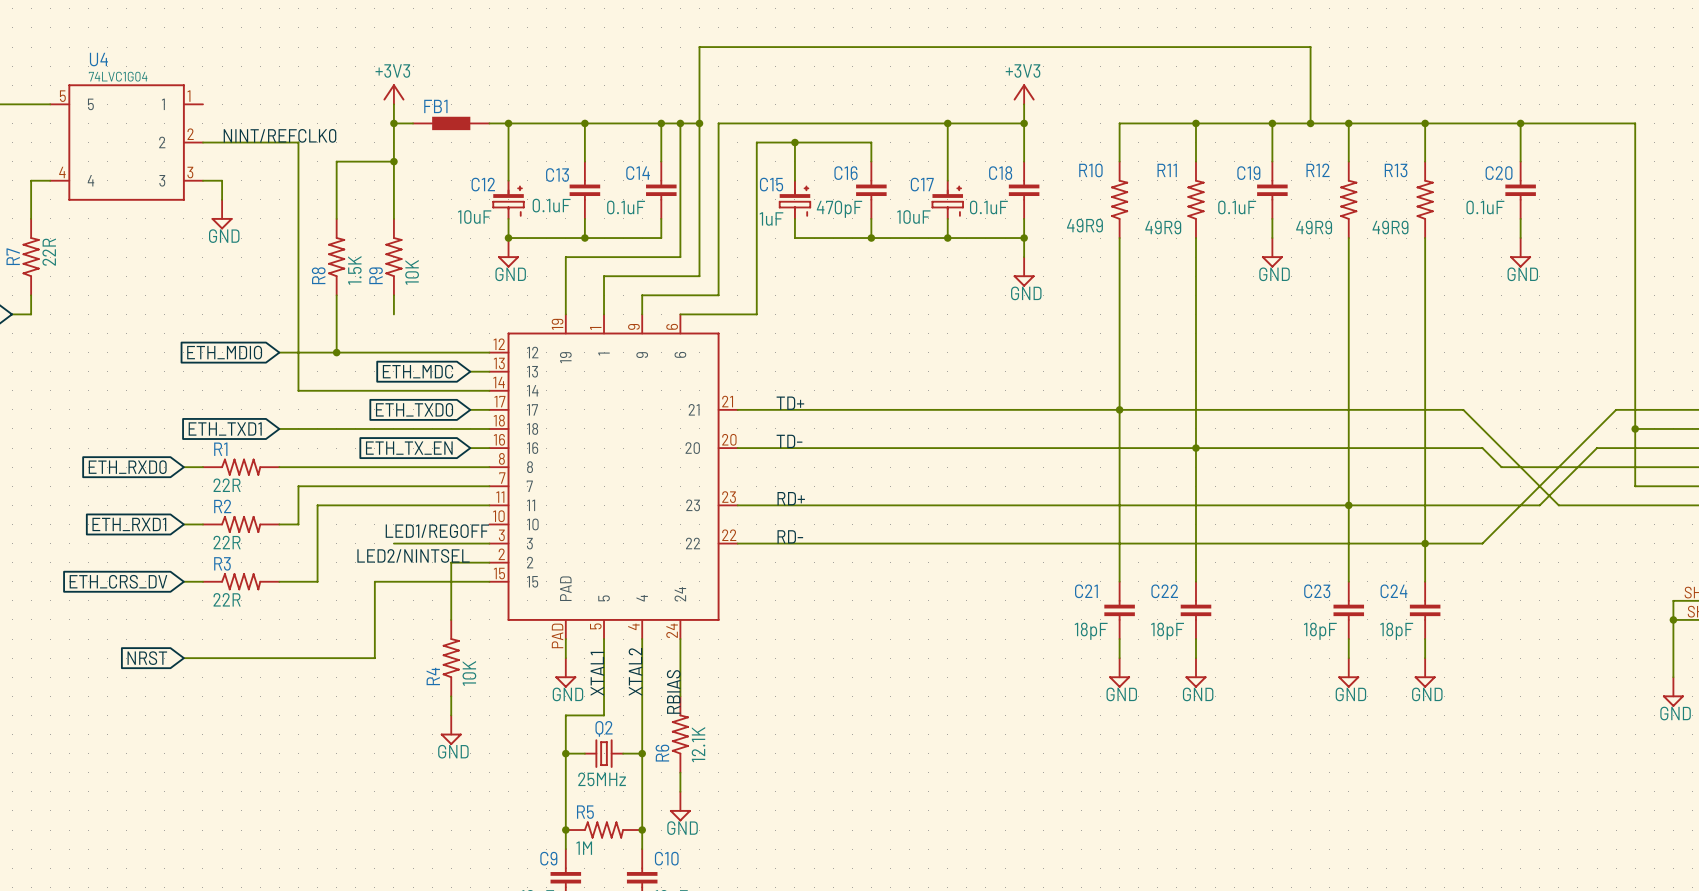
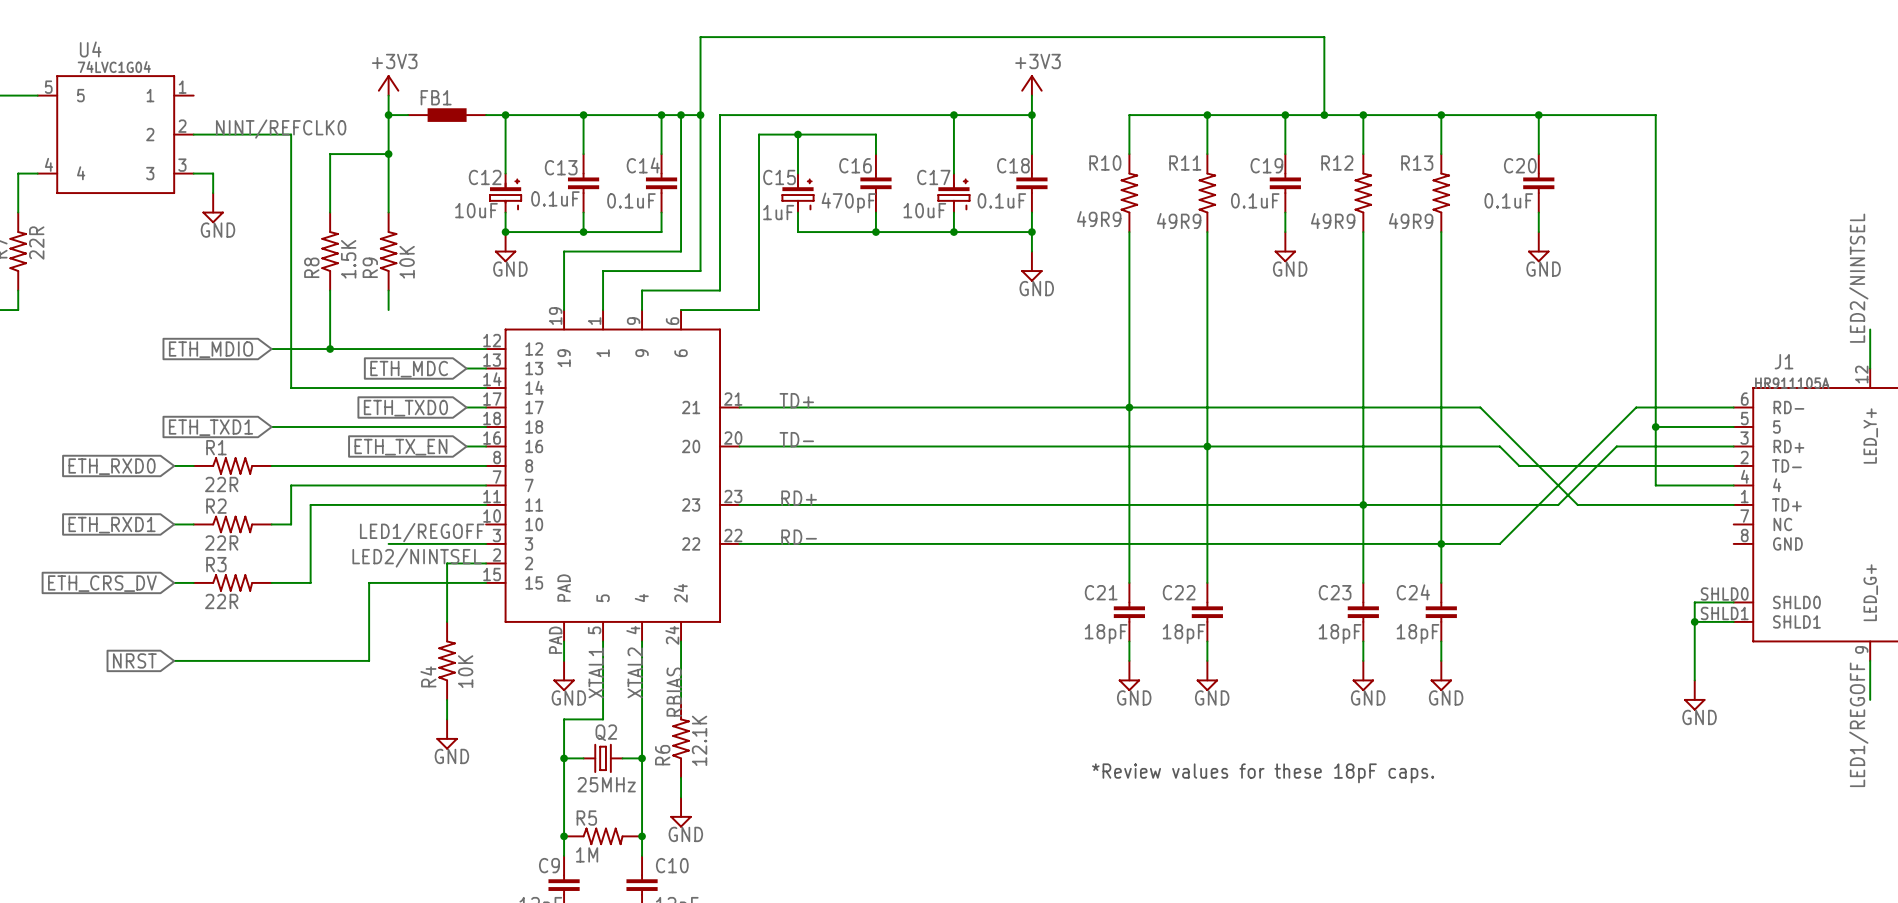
text: none -> *Review values for these 18pF caps. (1263, 773)

